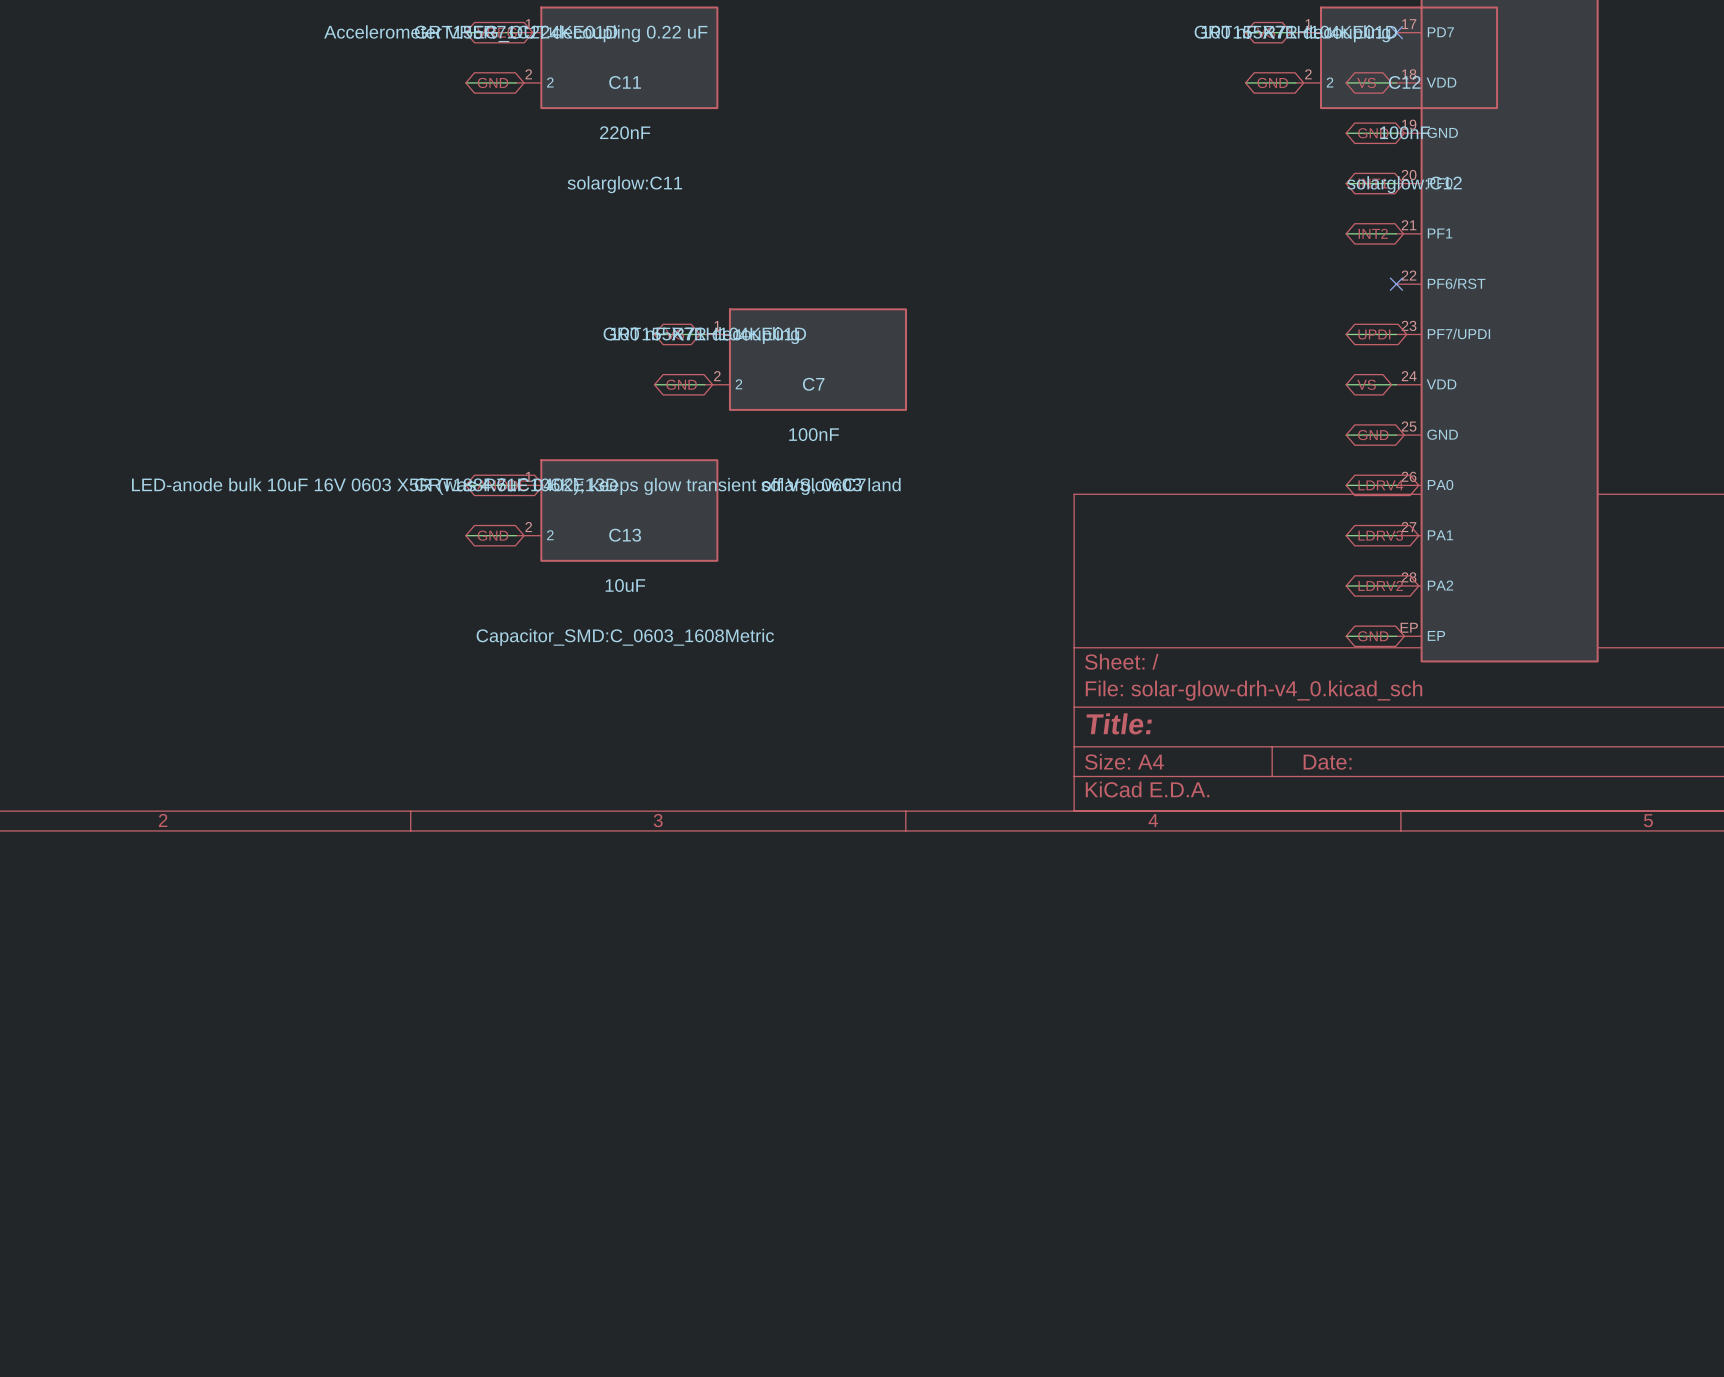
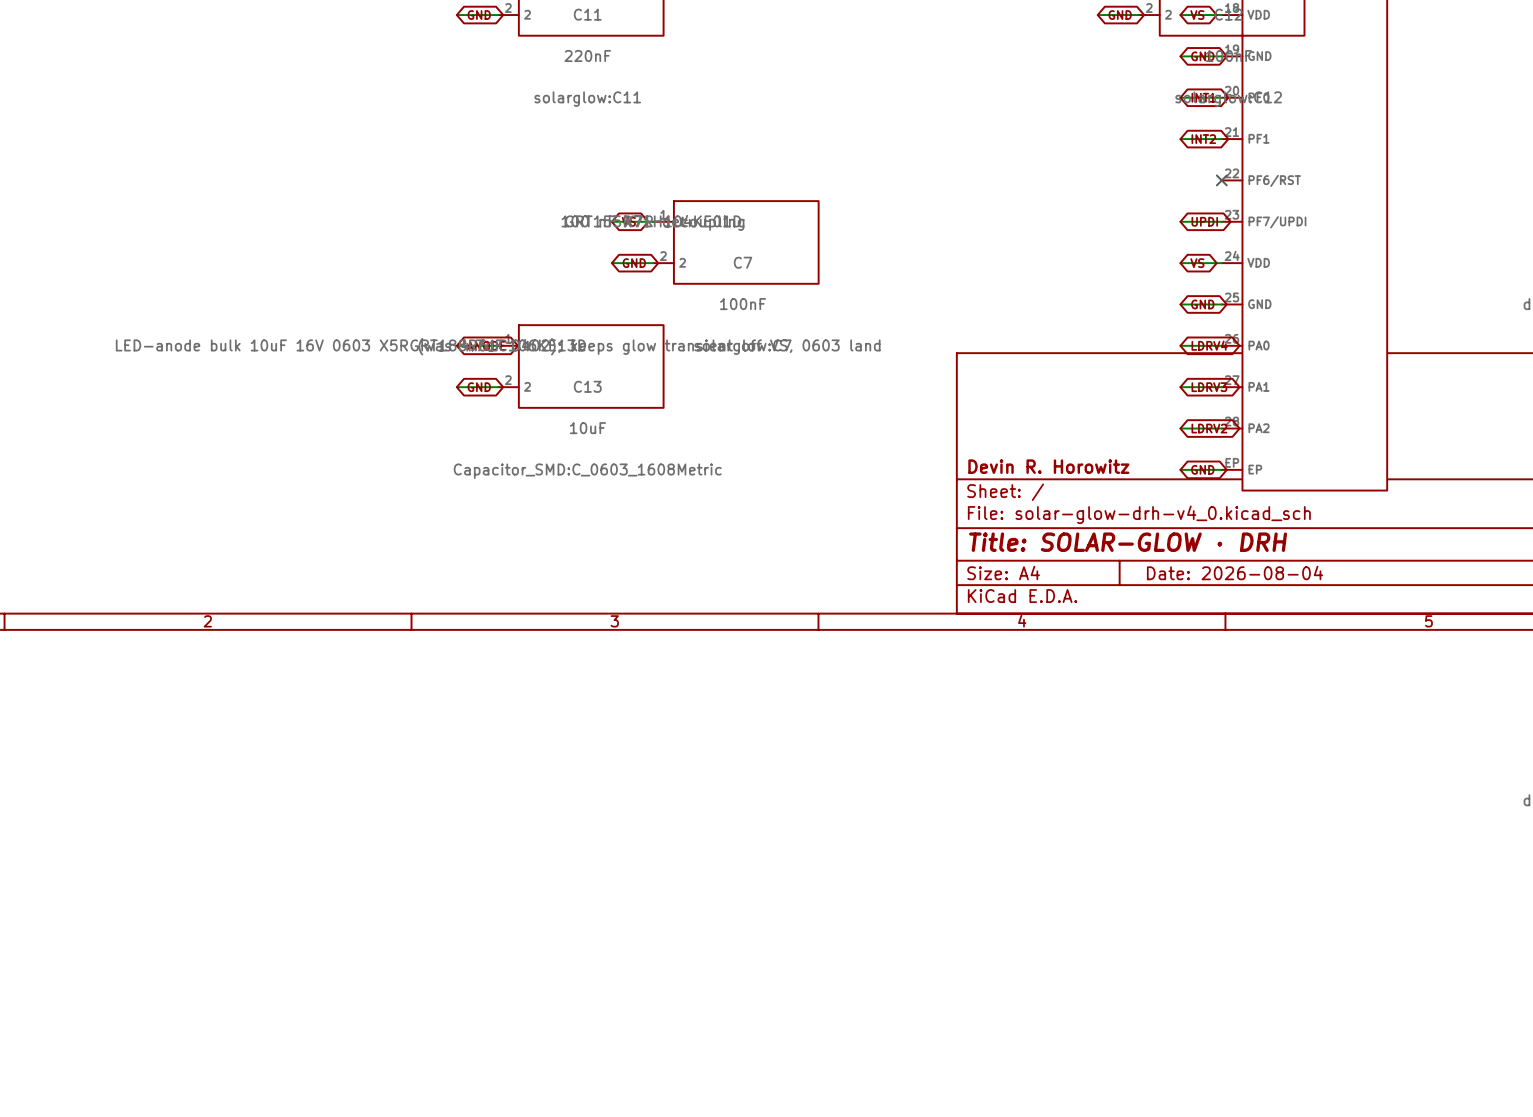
title block: none -> Devin R. Horowitz (1048, 466)
title block: Title: (1119, 723) -> Title: SOLAR-GLOW · DRH (1128, 542)
title block: Date: (1327, 762) -> Date: 2026-08-04 (1234, 572)

